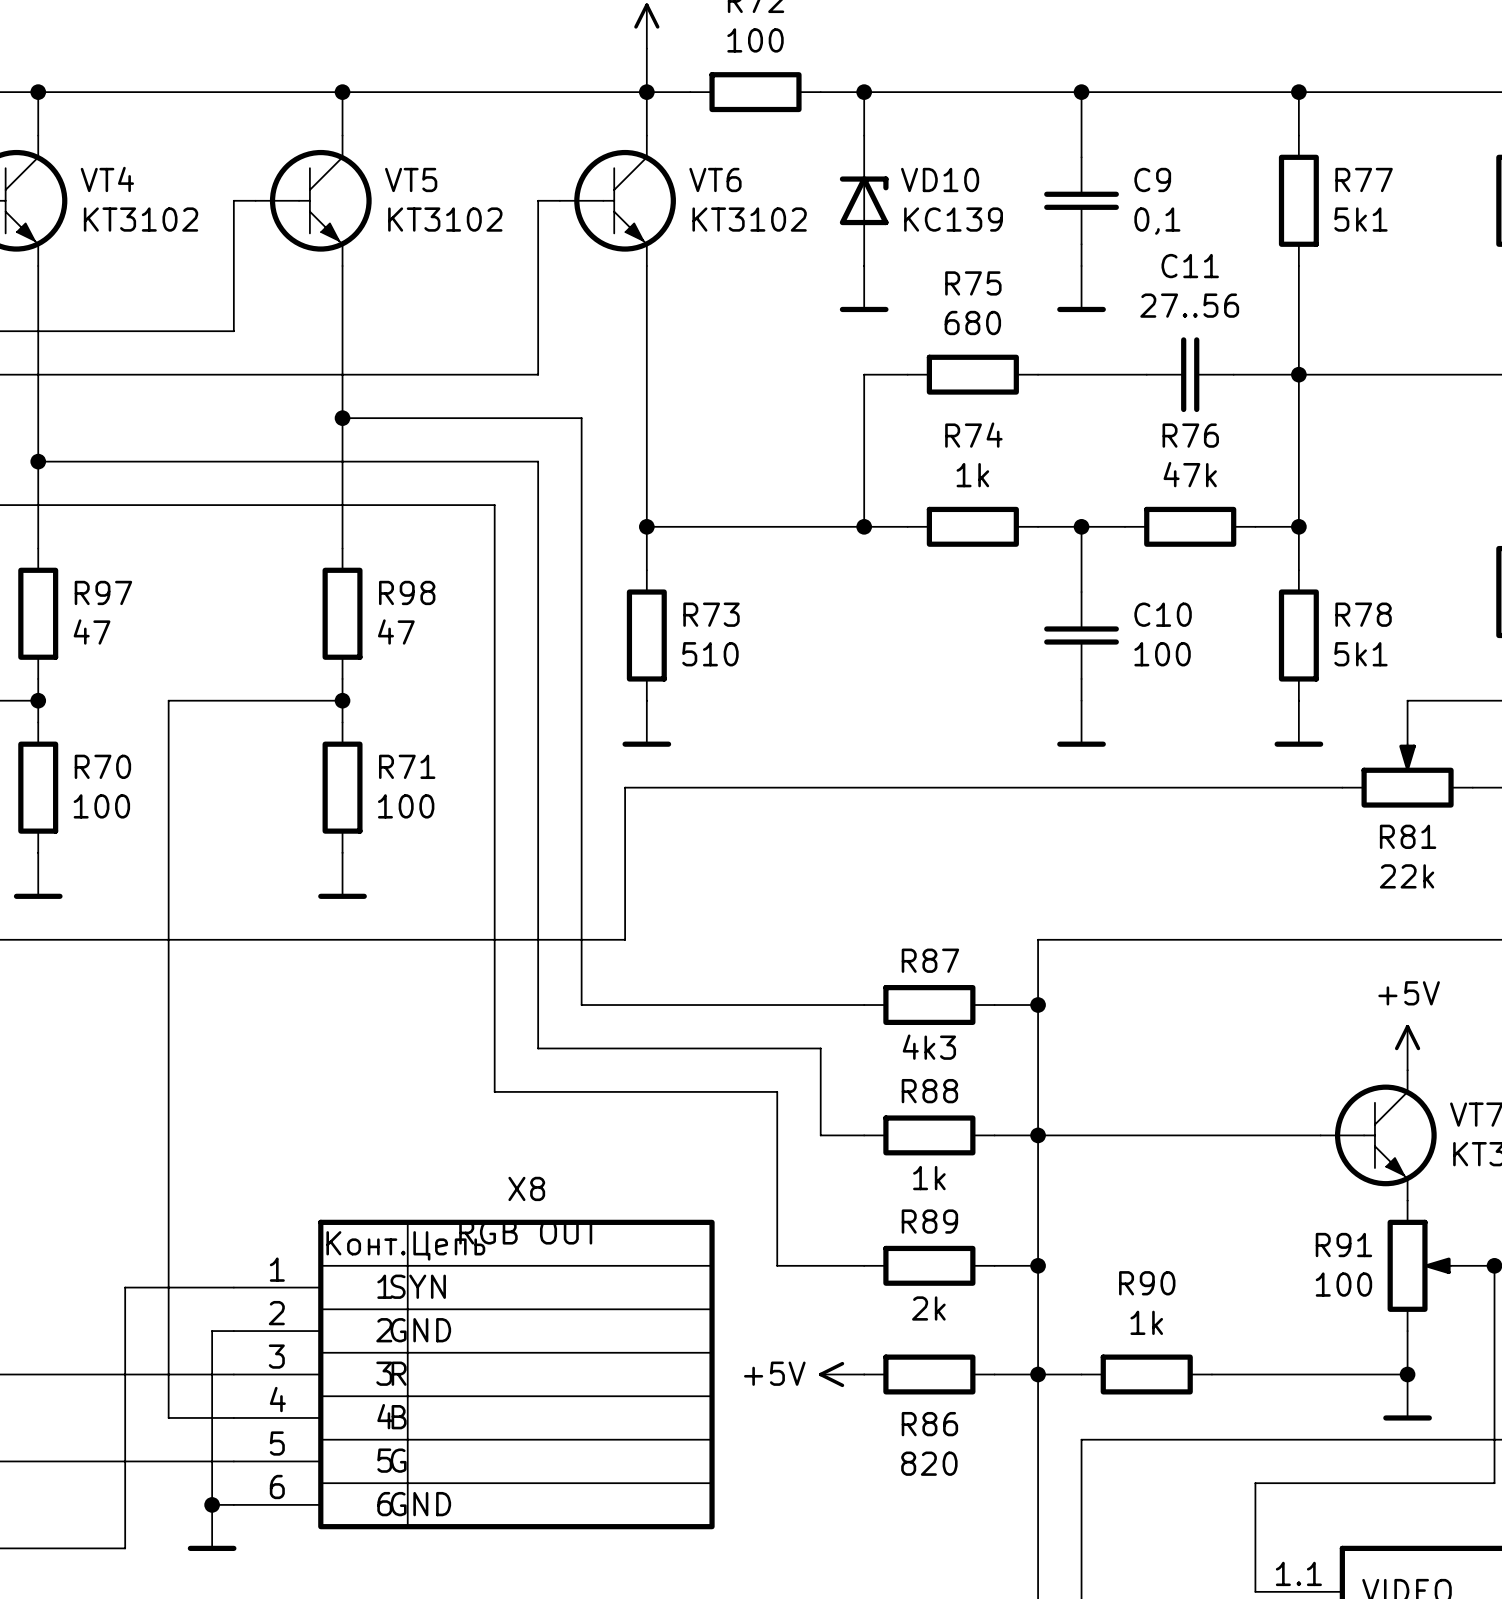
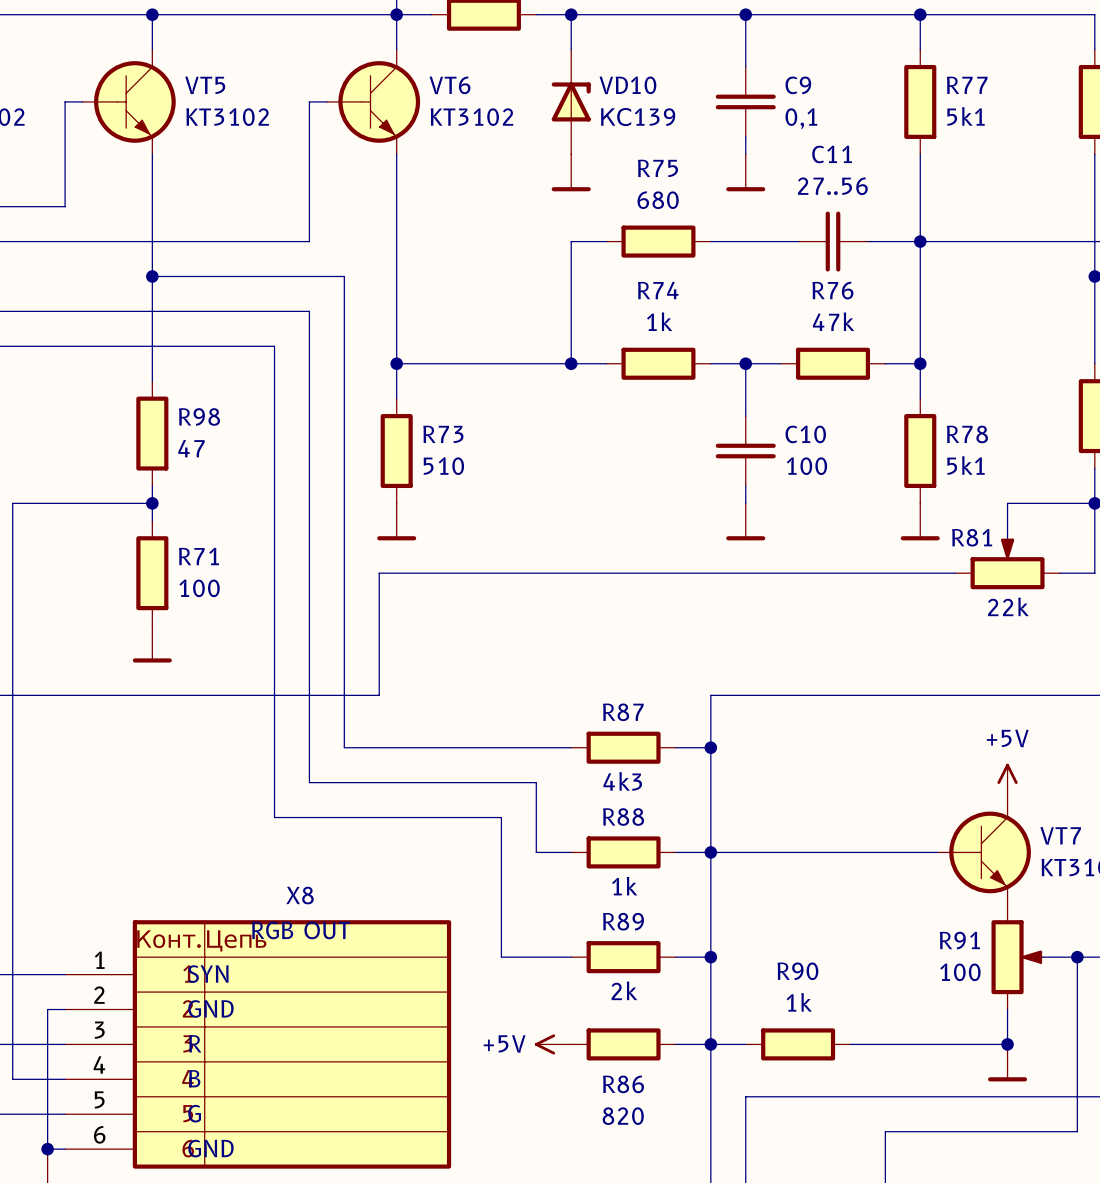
R81 name position: R81 (1408, 836) -> R81 (972, 537)
R81 value position: 22k (1407, 876) -> 22k (1008, 606)

